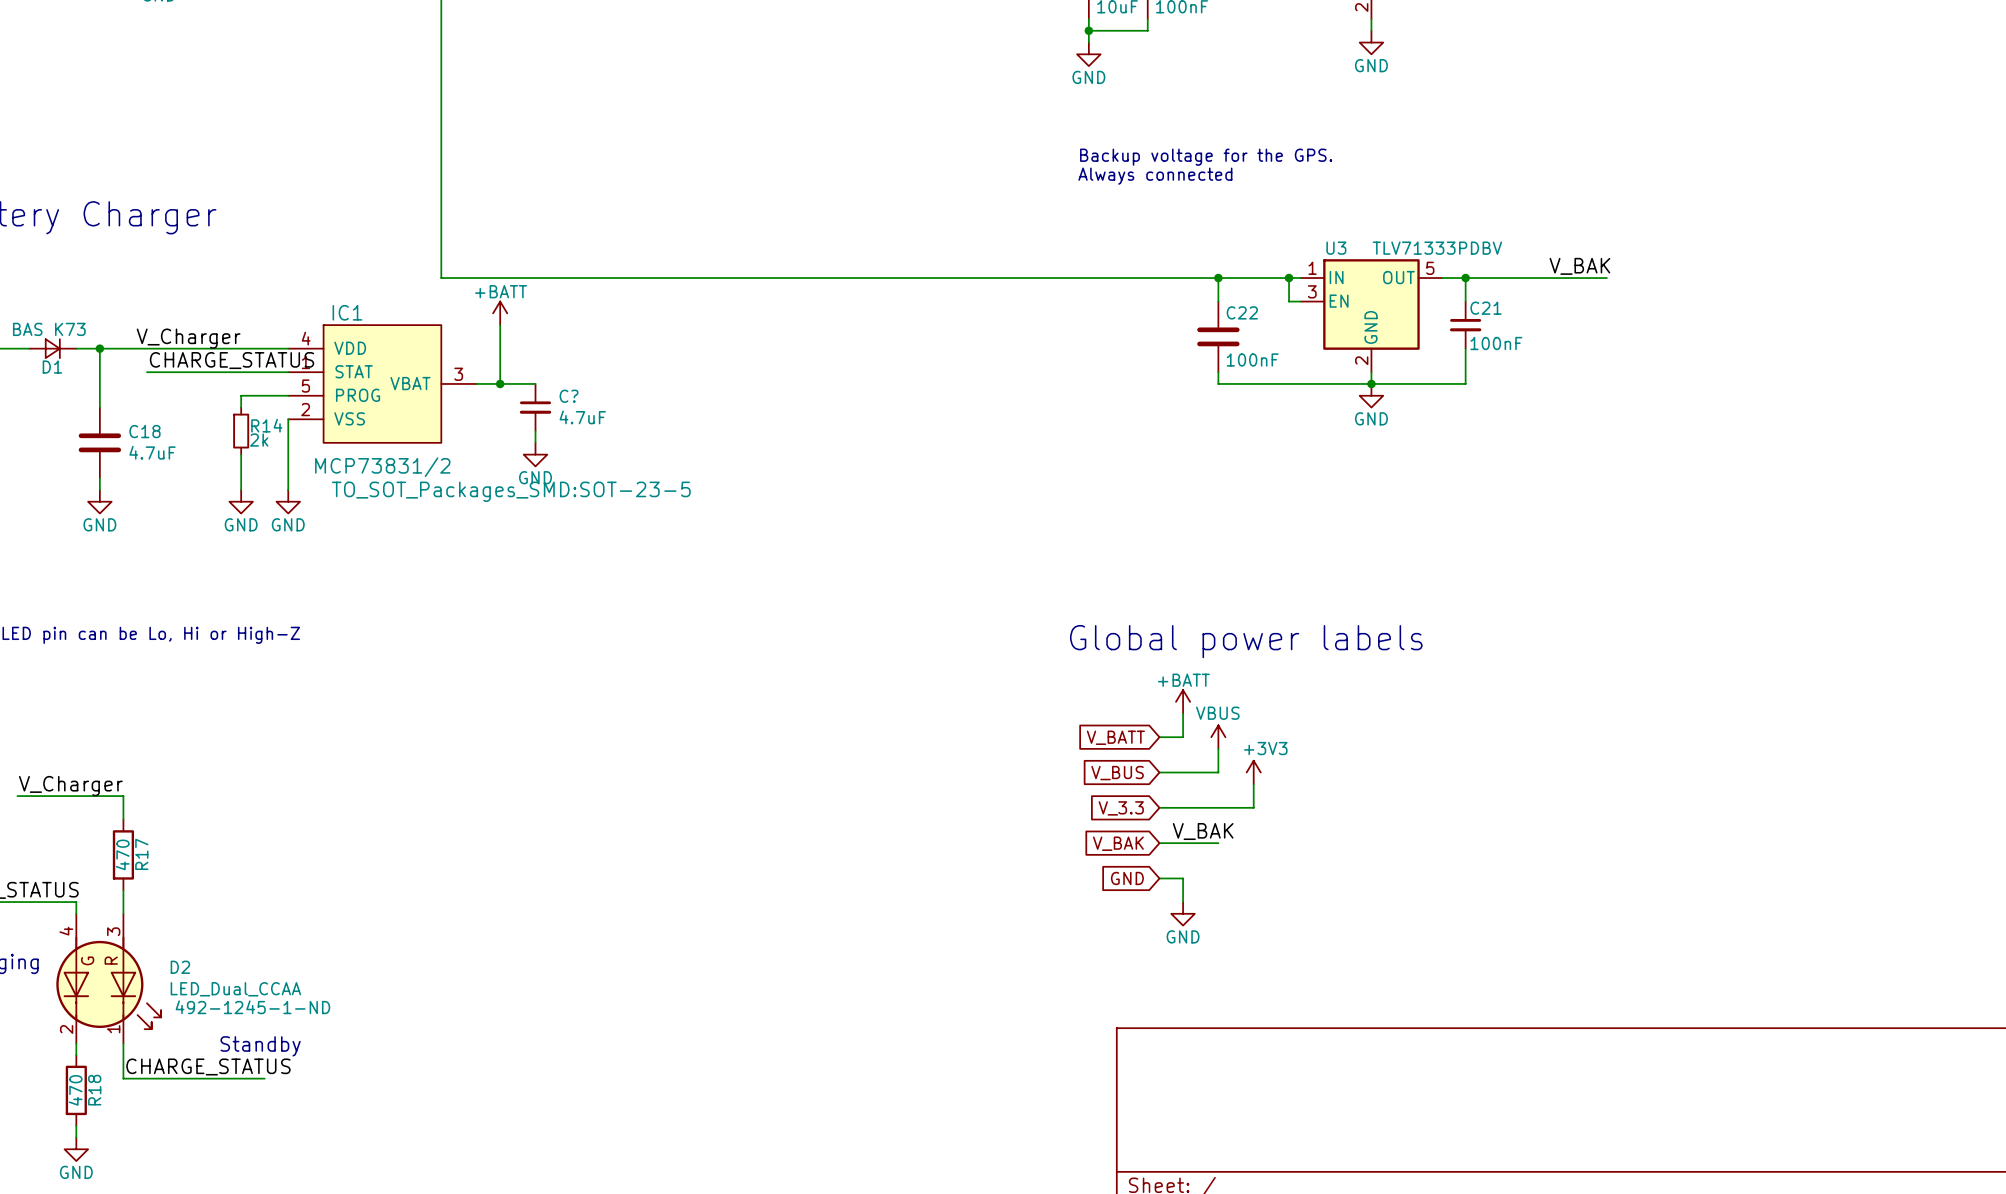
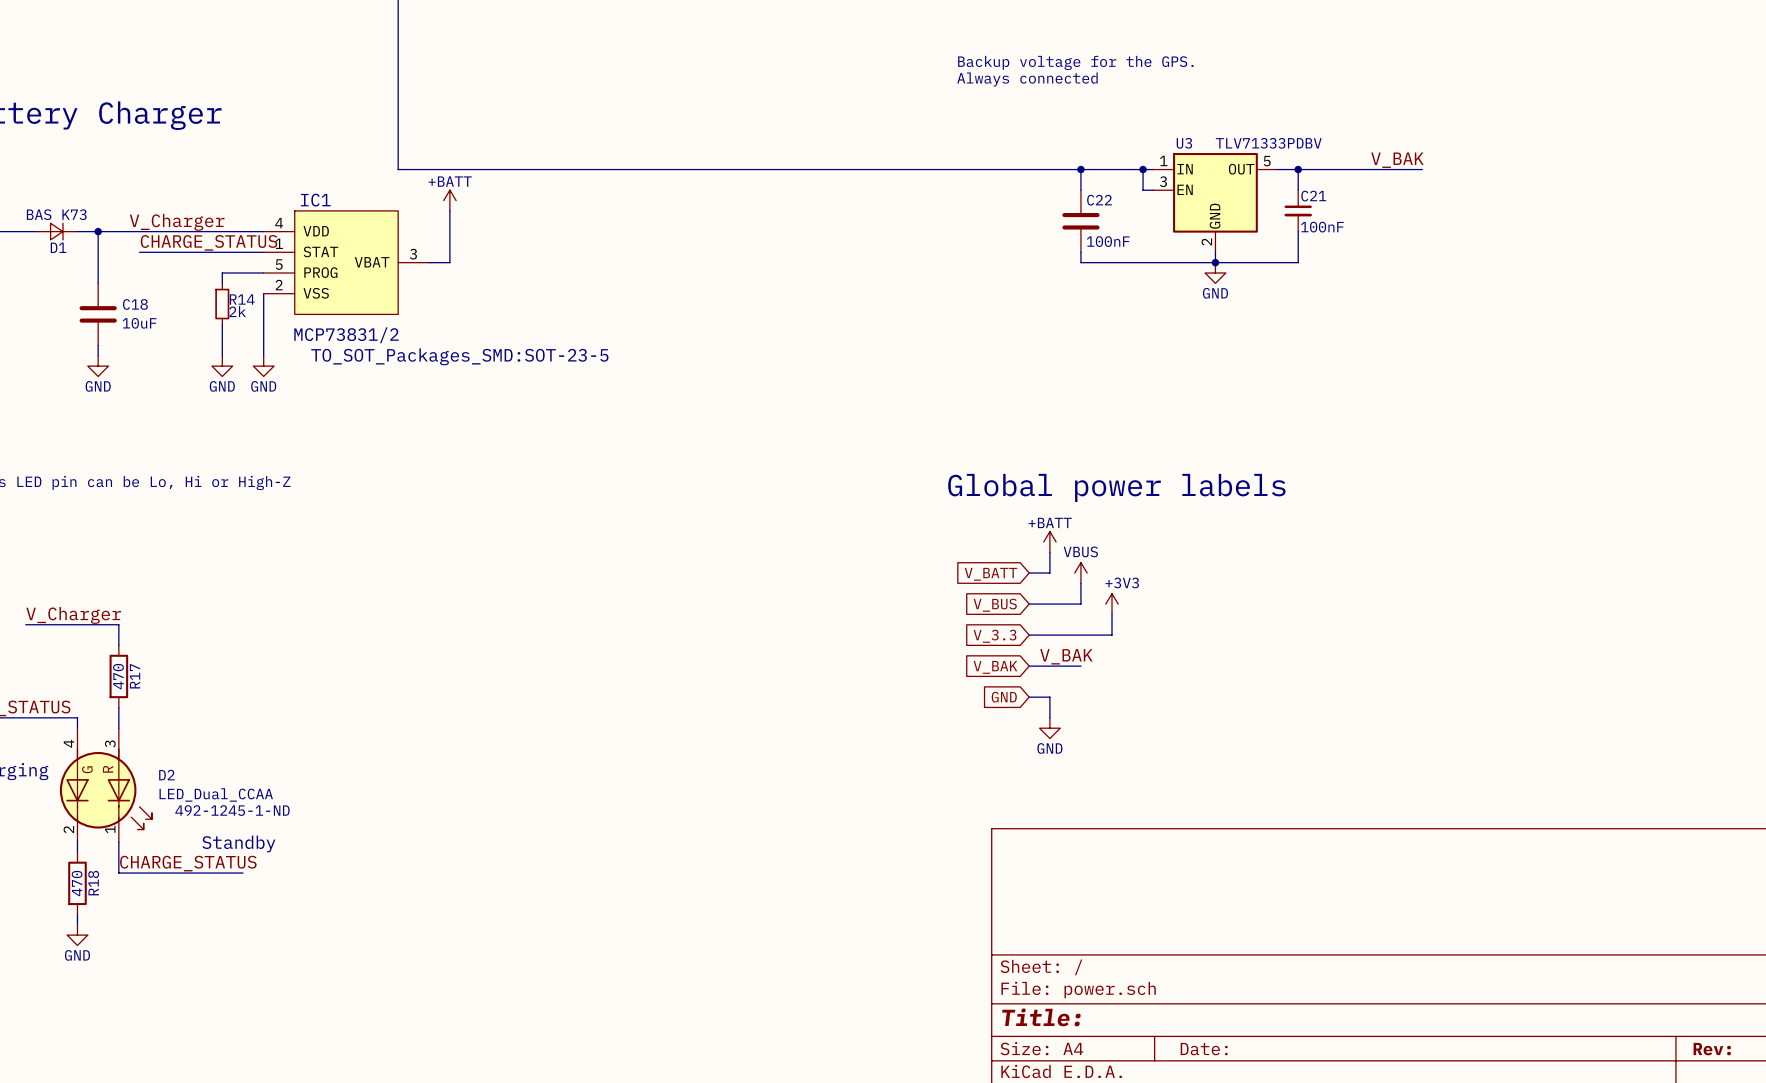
wire: (500, 383) (535, 383) -> none
junction: (500, 383) -> none
C?: 4.7uF (535, 407) -> none
wire: (535, 431) (535, 442) -> none
C18 value: 4.7uF (152, 452) -> 10uF (139, 323)
power symbol: GND (535, 454) -> none

